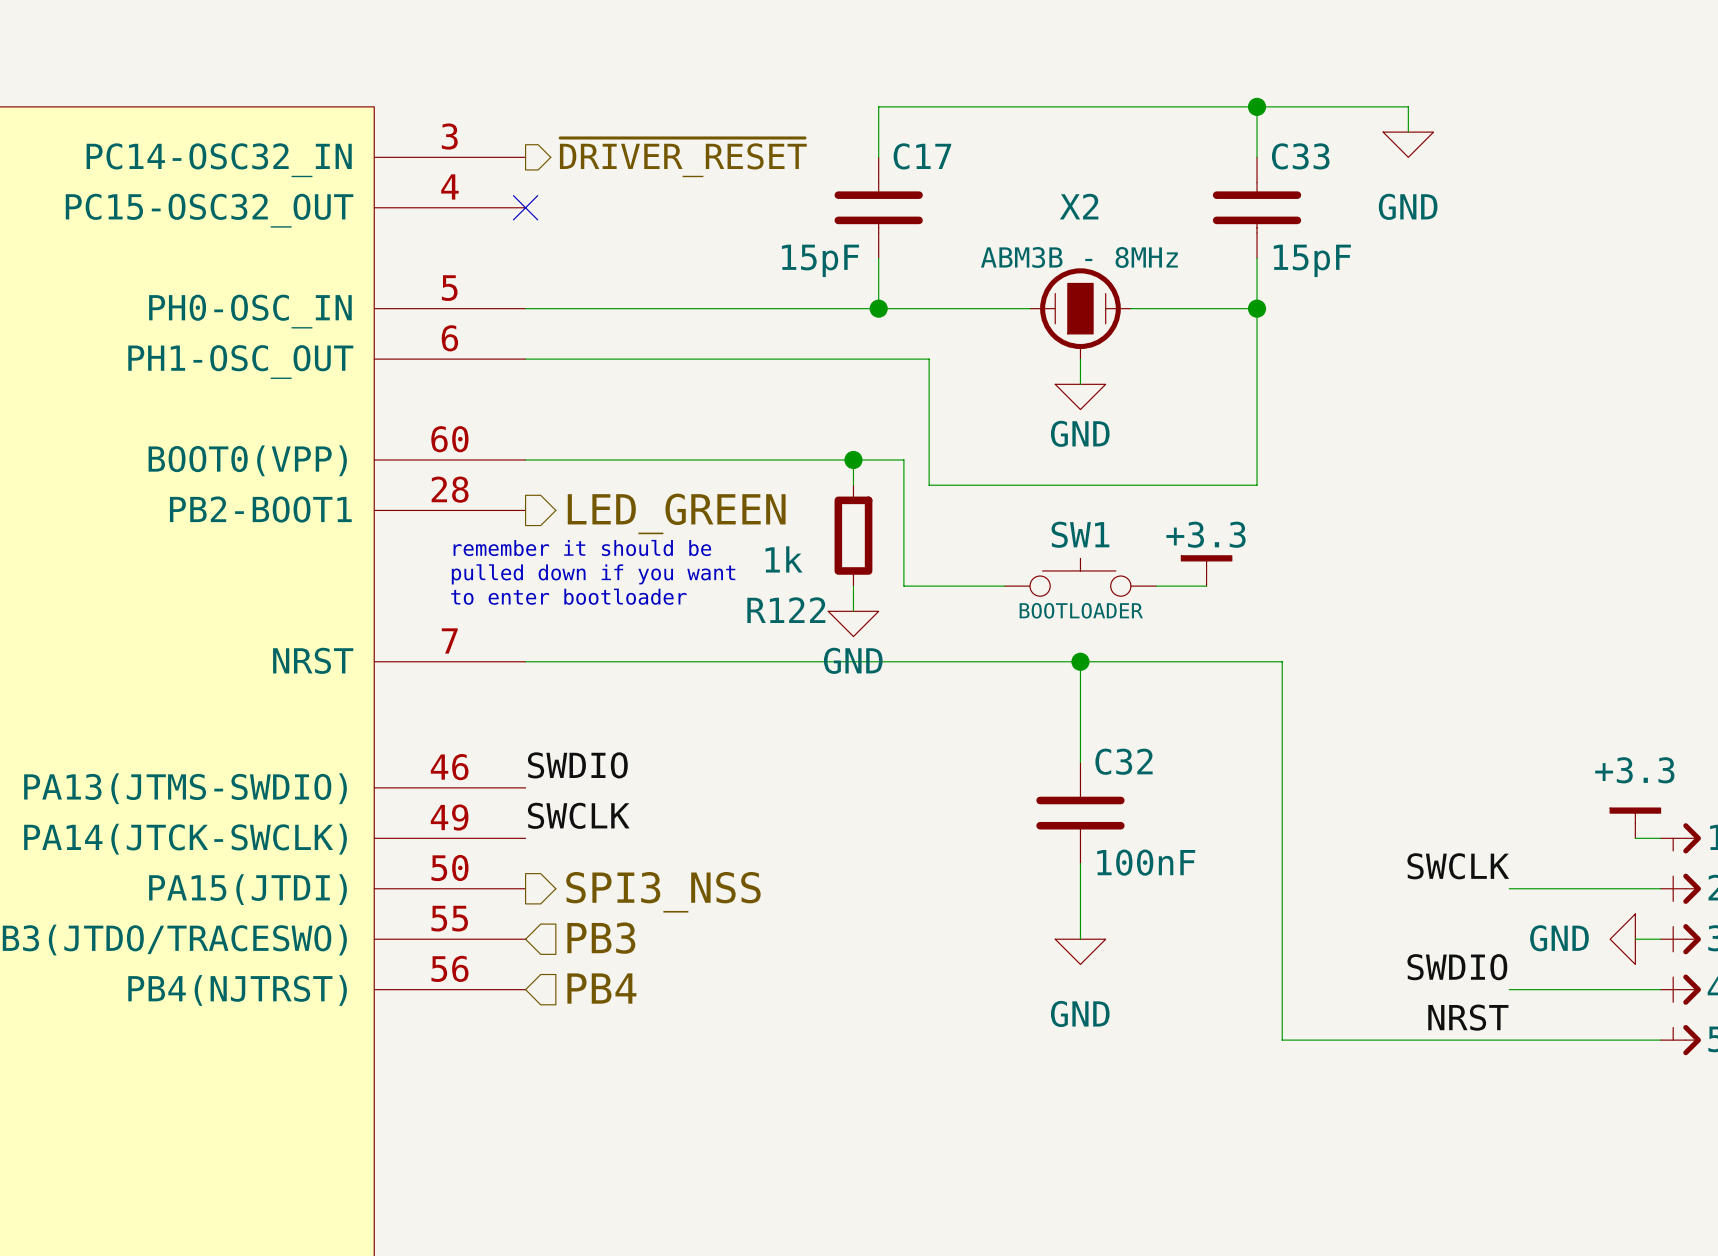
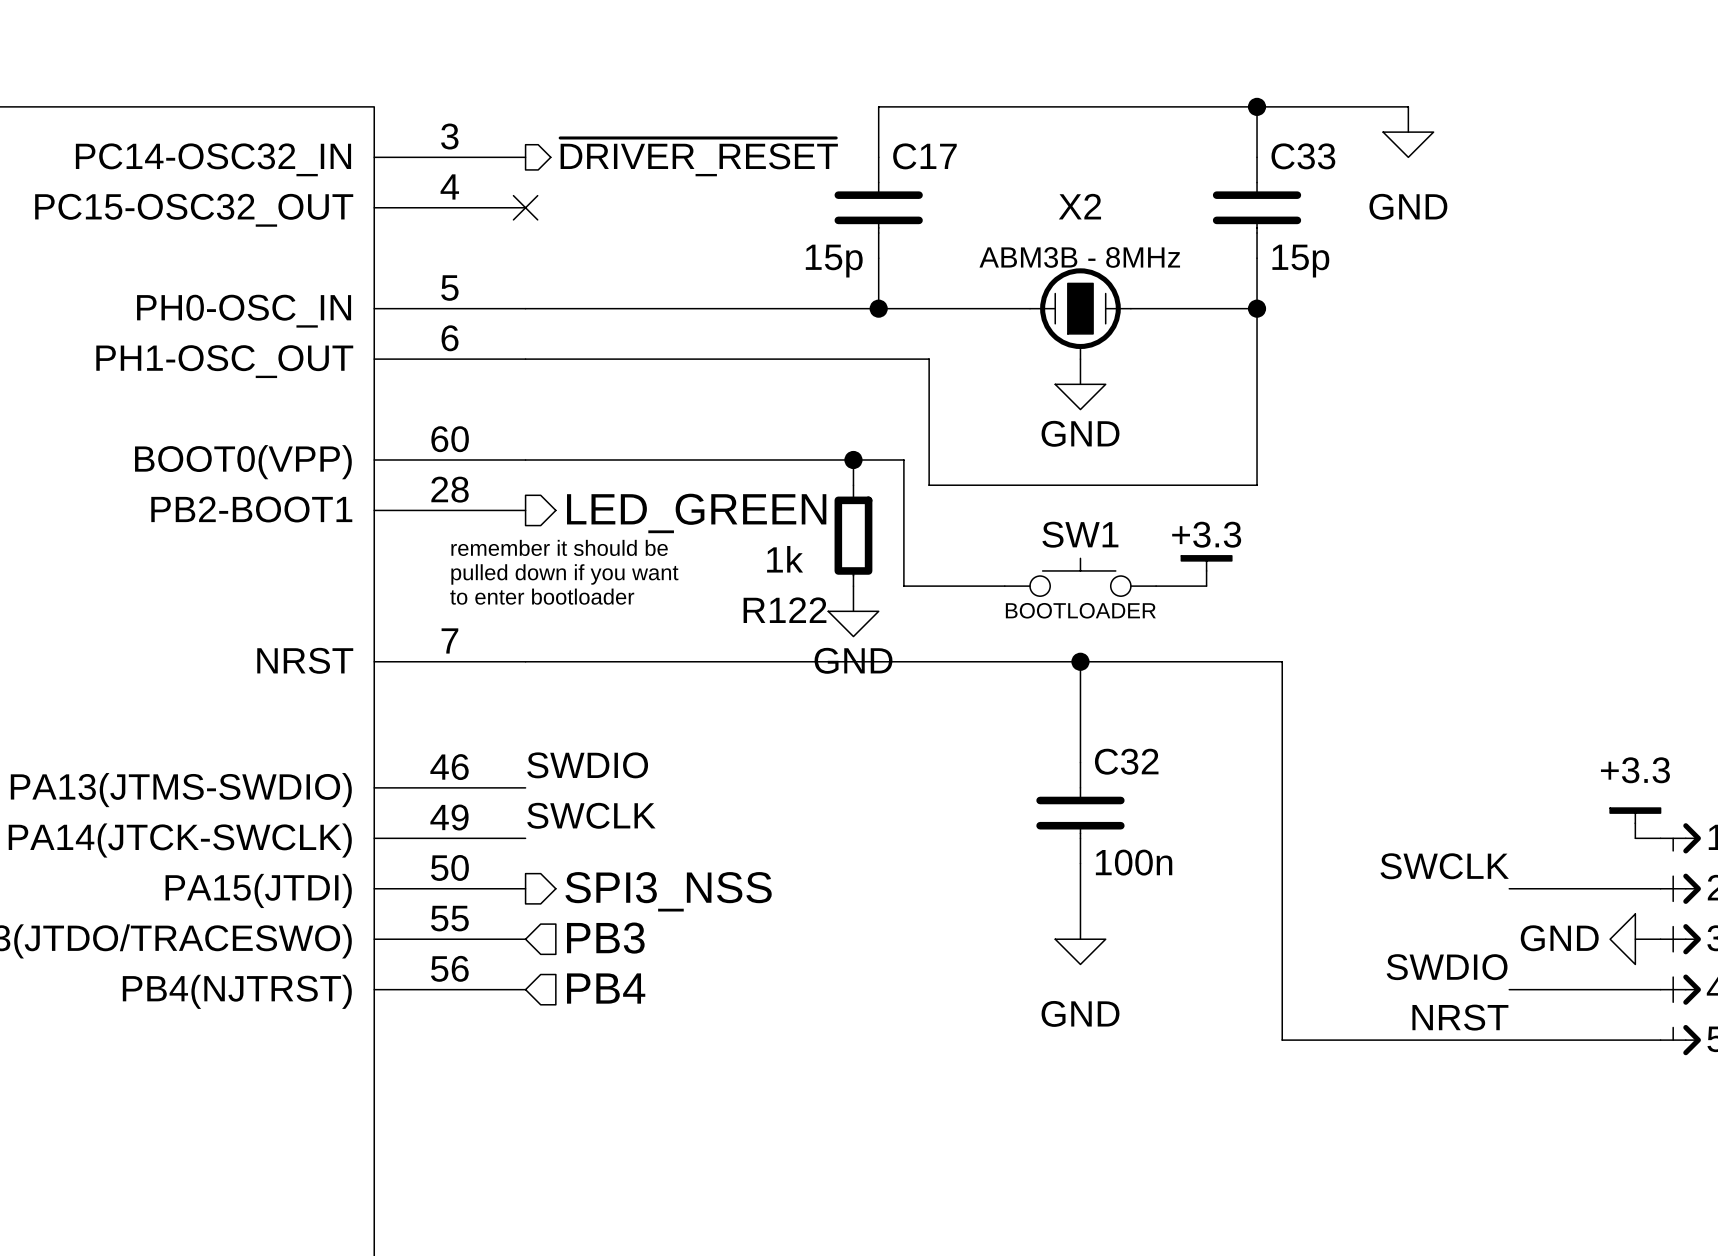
C17 value: 15pF (820, 260) -> 15p (834, 261)
C33 value: 15pF (1312, 260) -> 15p (1300, 261)
C32 value: 100nF (1146, 862) -> 100n (1134, 862)

